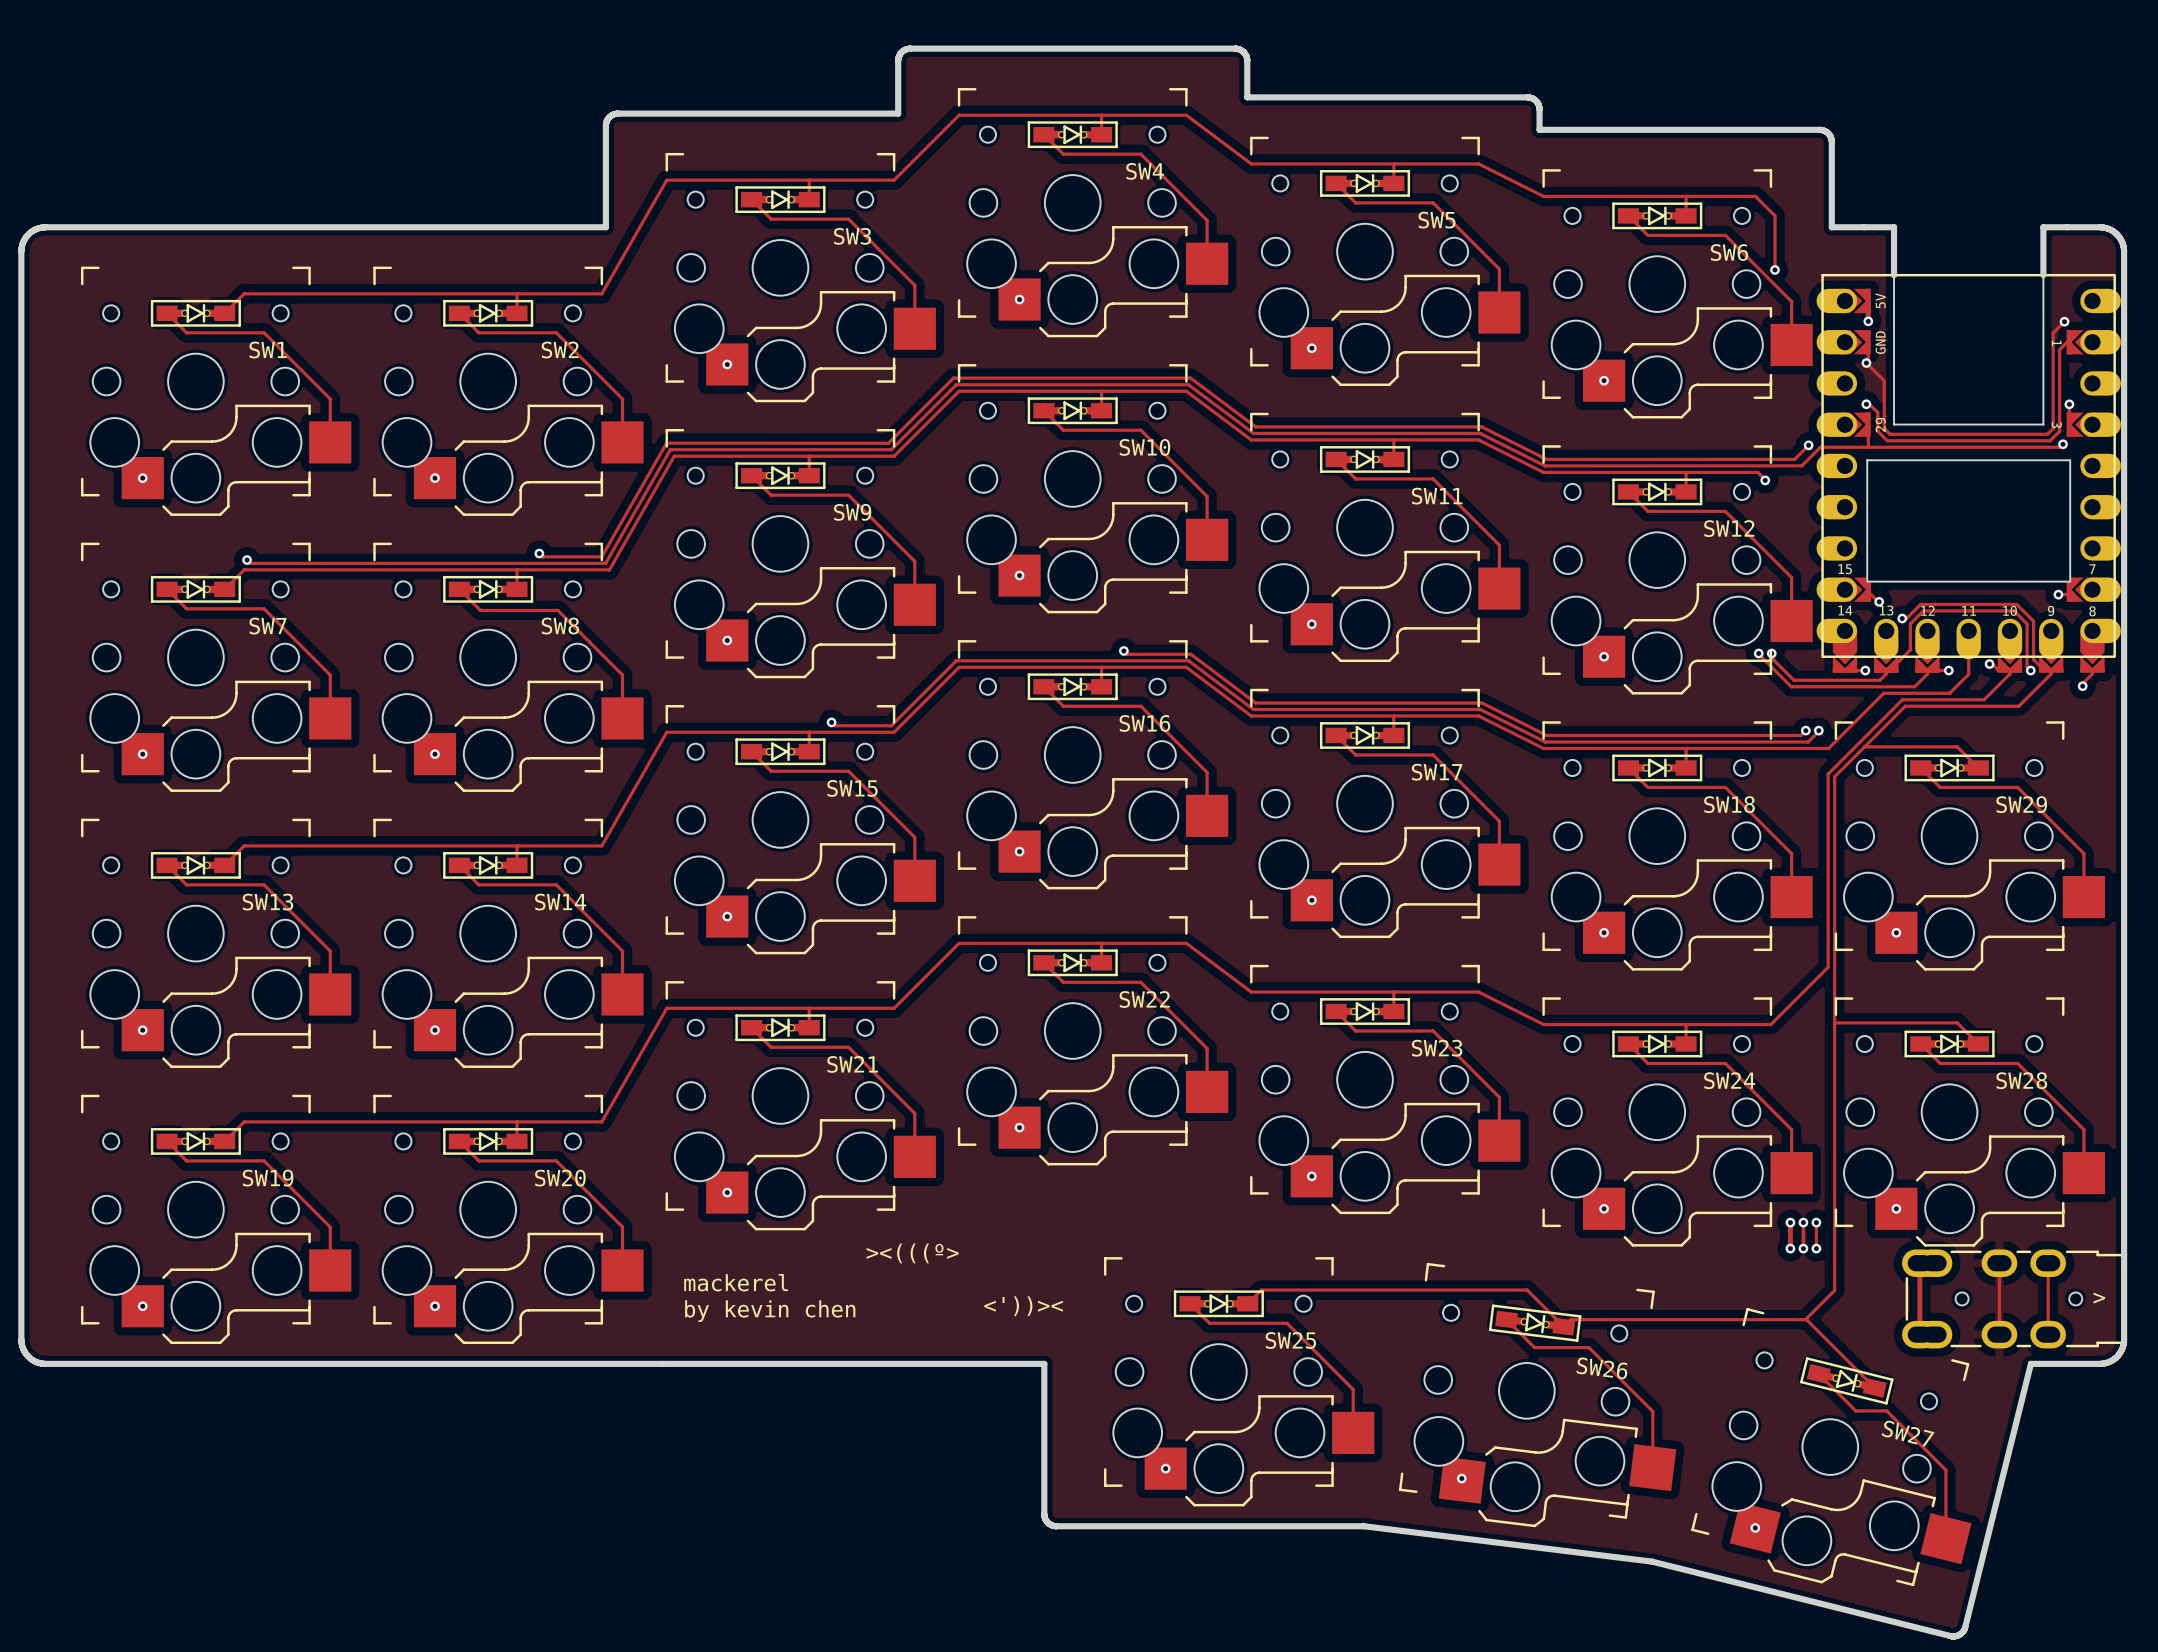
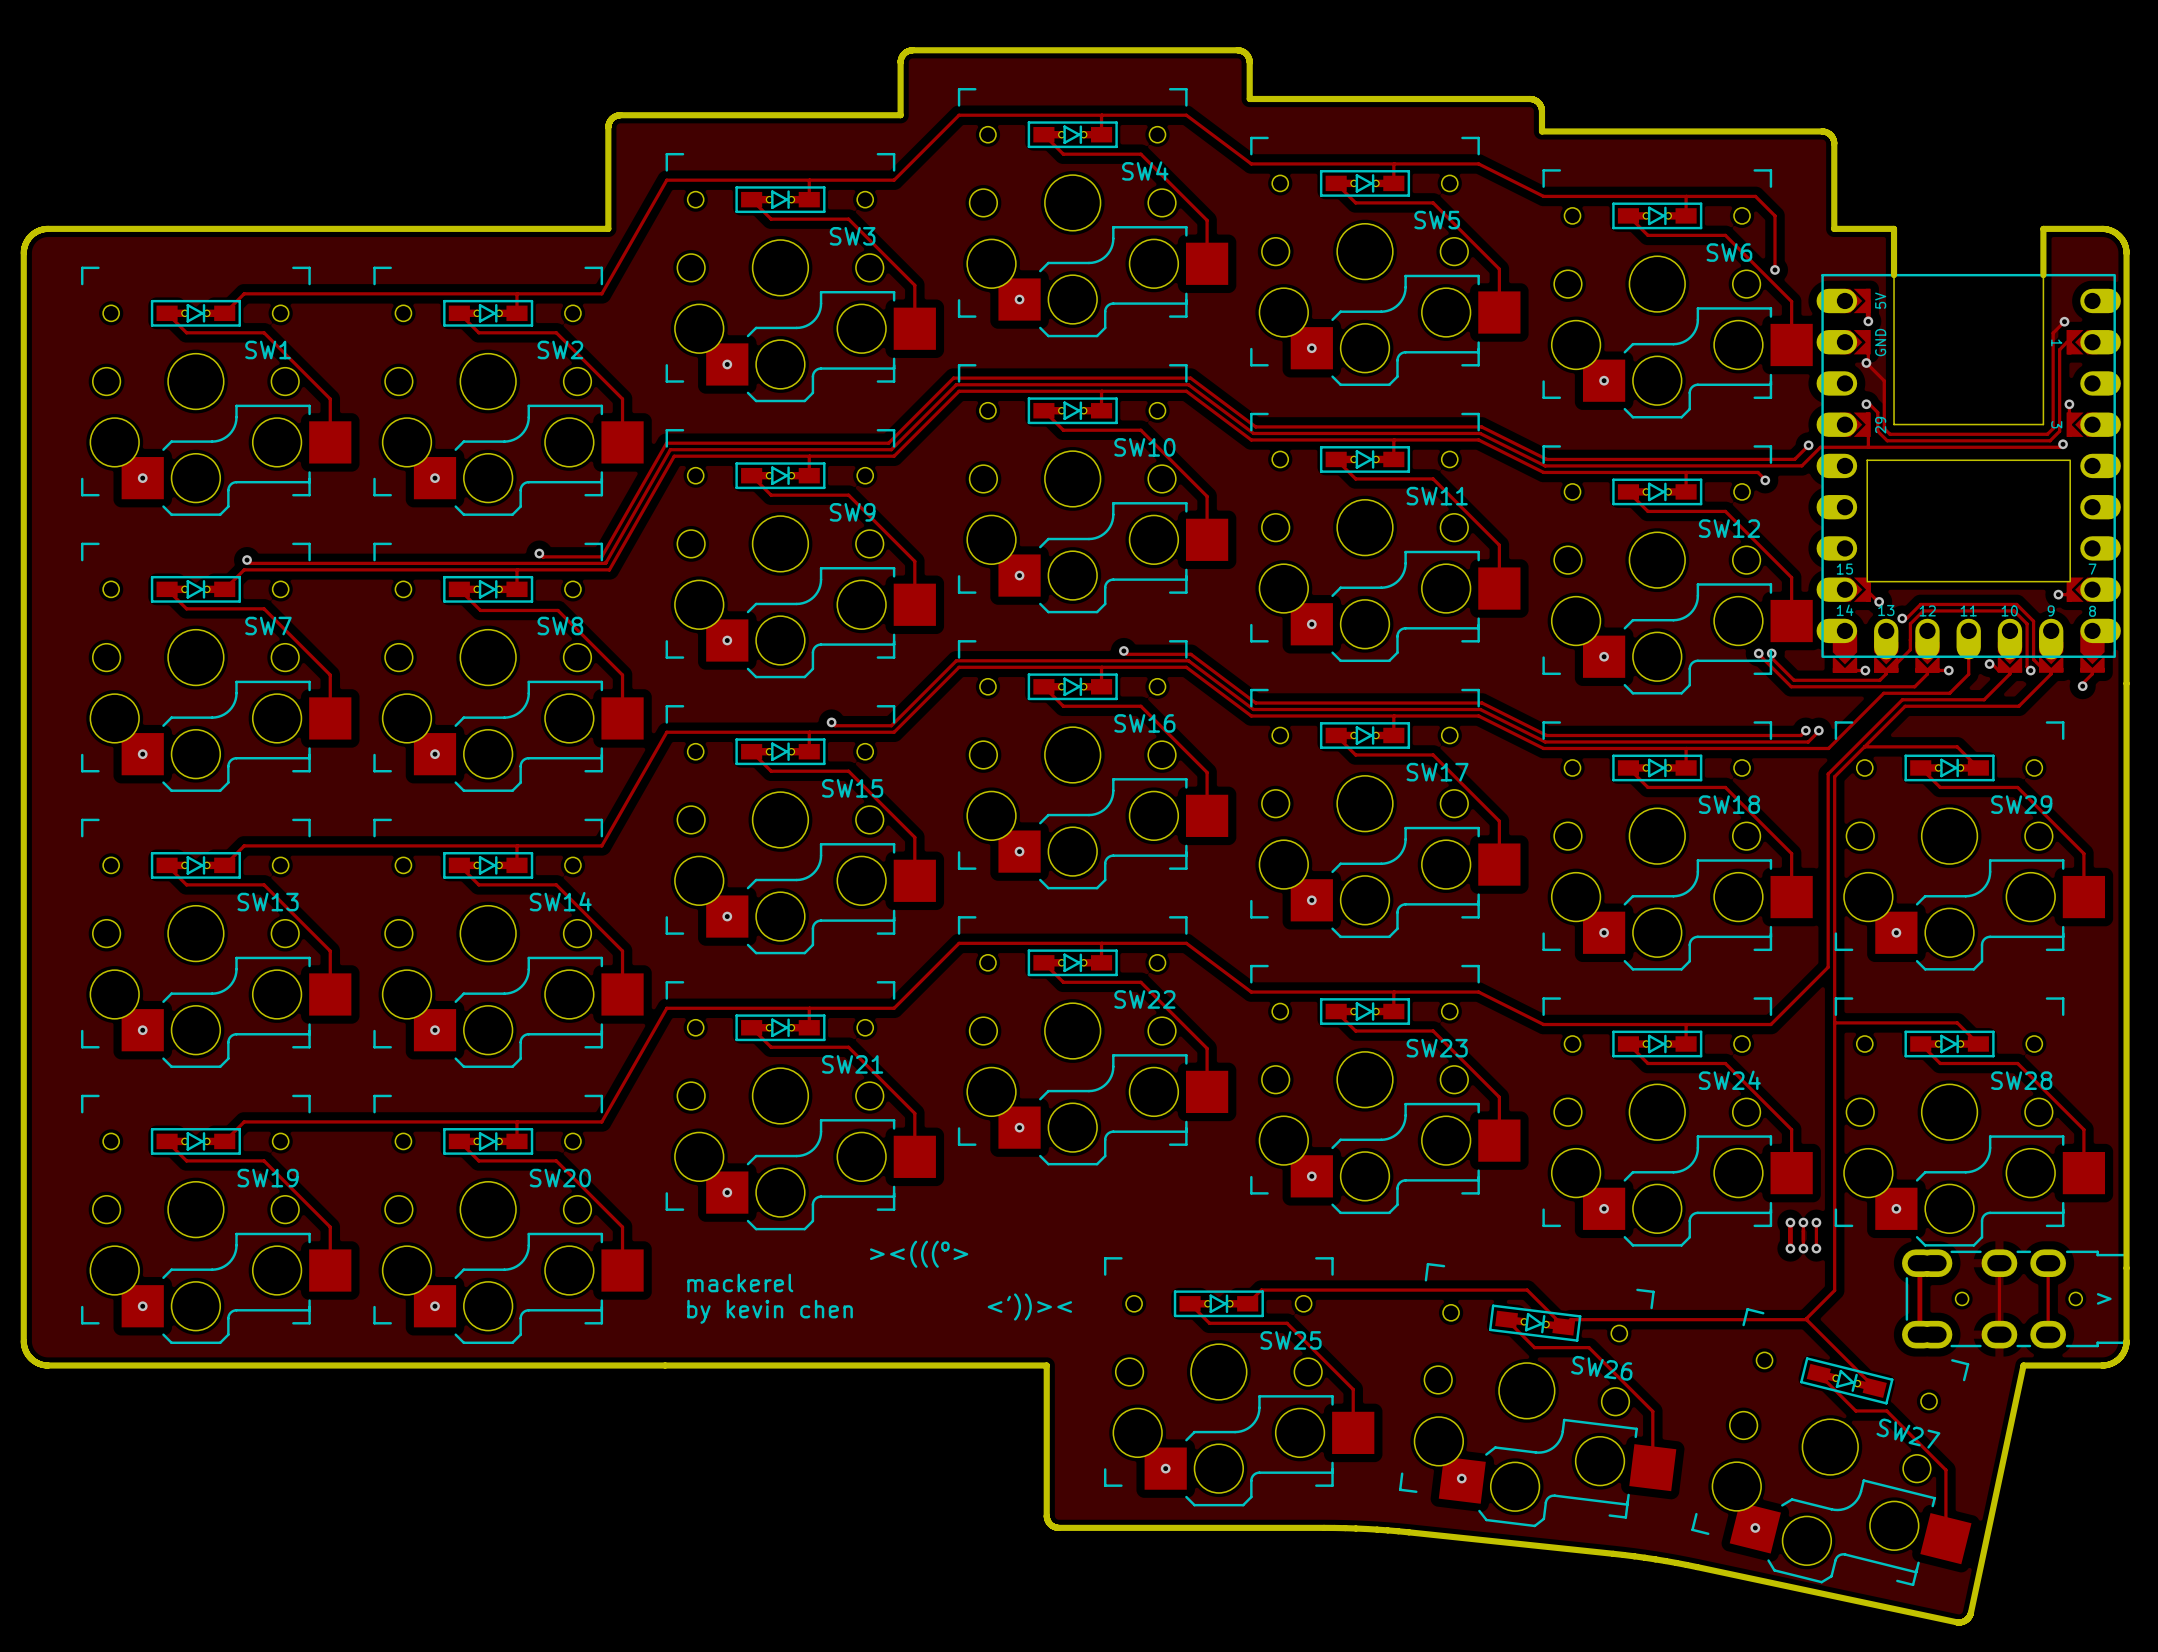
board edge: (1894, 228) (1894, 227) (1831, 227) (1831, 140) (1828, 133) (1822, 130) (1539, 129) (1538, 105) (1534, 99) (1528, 97) (1247, 97) (1246, 57) (1243, 51) (1236, 48) (910, 48) (902, 51) (898, 58) (898, 113) (618, 113) (611, 115) (605, 125) (605, 227) (45, 227) (33, 230) (24, 239) (21, 251) (21, 1339) (24, 1352) (33, 1360) (45, 1363) (1044, 1363) (1044, 1514) (1047, 1521) (1052, 1525) (1364, 1526) (1652, 1561) (1950, 1636) (1959, 1634) (1965, 1627) (2030, 1363) (2105, 1363) (2118, 1355) (2124, 1340) (2124, 250) (2118, 236) (2105, 228) (2043, 227) (2043, 228) -> (1894, 228) (1834, 228) (1834, 142) (1831, 135) (1824, 131) (1541, 131) (1541, 106) (1537, 101) (1530, 99) (1249, 98) (1249, 59) (1245, 53) (1238, 50) (912, 50) (905, 53) (900, 60) (900, 115) (620, 115) (614, 116) (608, 126) (608, 228) (48, 228) (35, 232) (27, 240) (23, 253) (23, 1341) (27, 1353) (35, 1362) (48, 1365) (1046, 1365) (1046, 1516) (1049, 1523) (1055, 1527) (1334, 1527) (1408, 1532) (1655, 1559) (1956, 1622) (1965, 1620) (1970, 1612) (2023, 1365) (2107, 1365) (2120, 1356) (2126, 1342) (2126, 251) (2120, 237) (2108, 229) (2043, 228)

